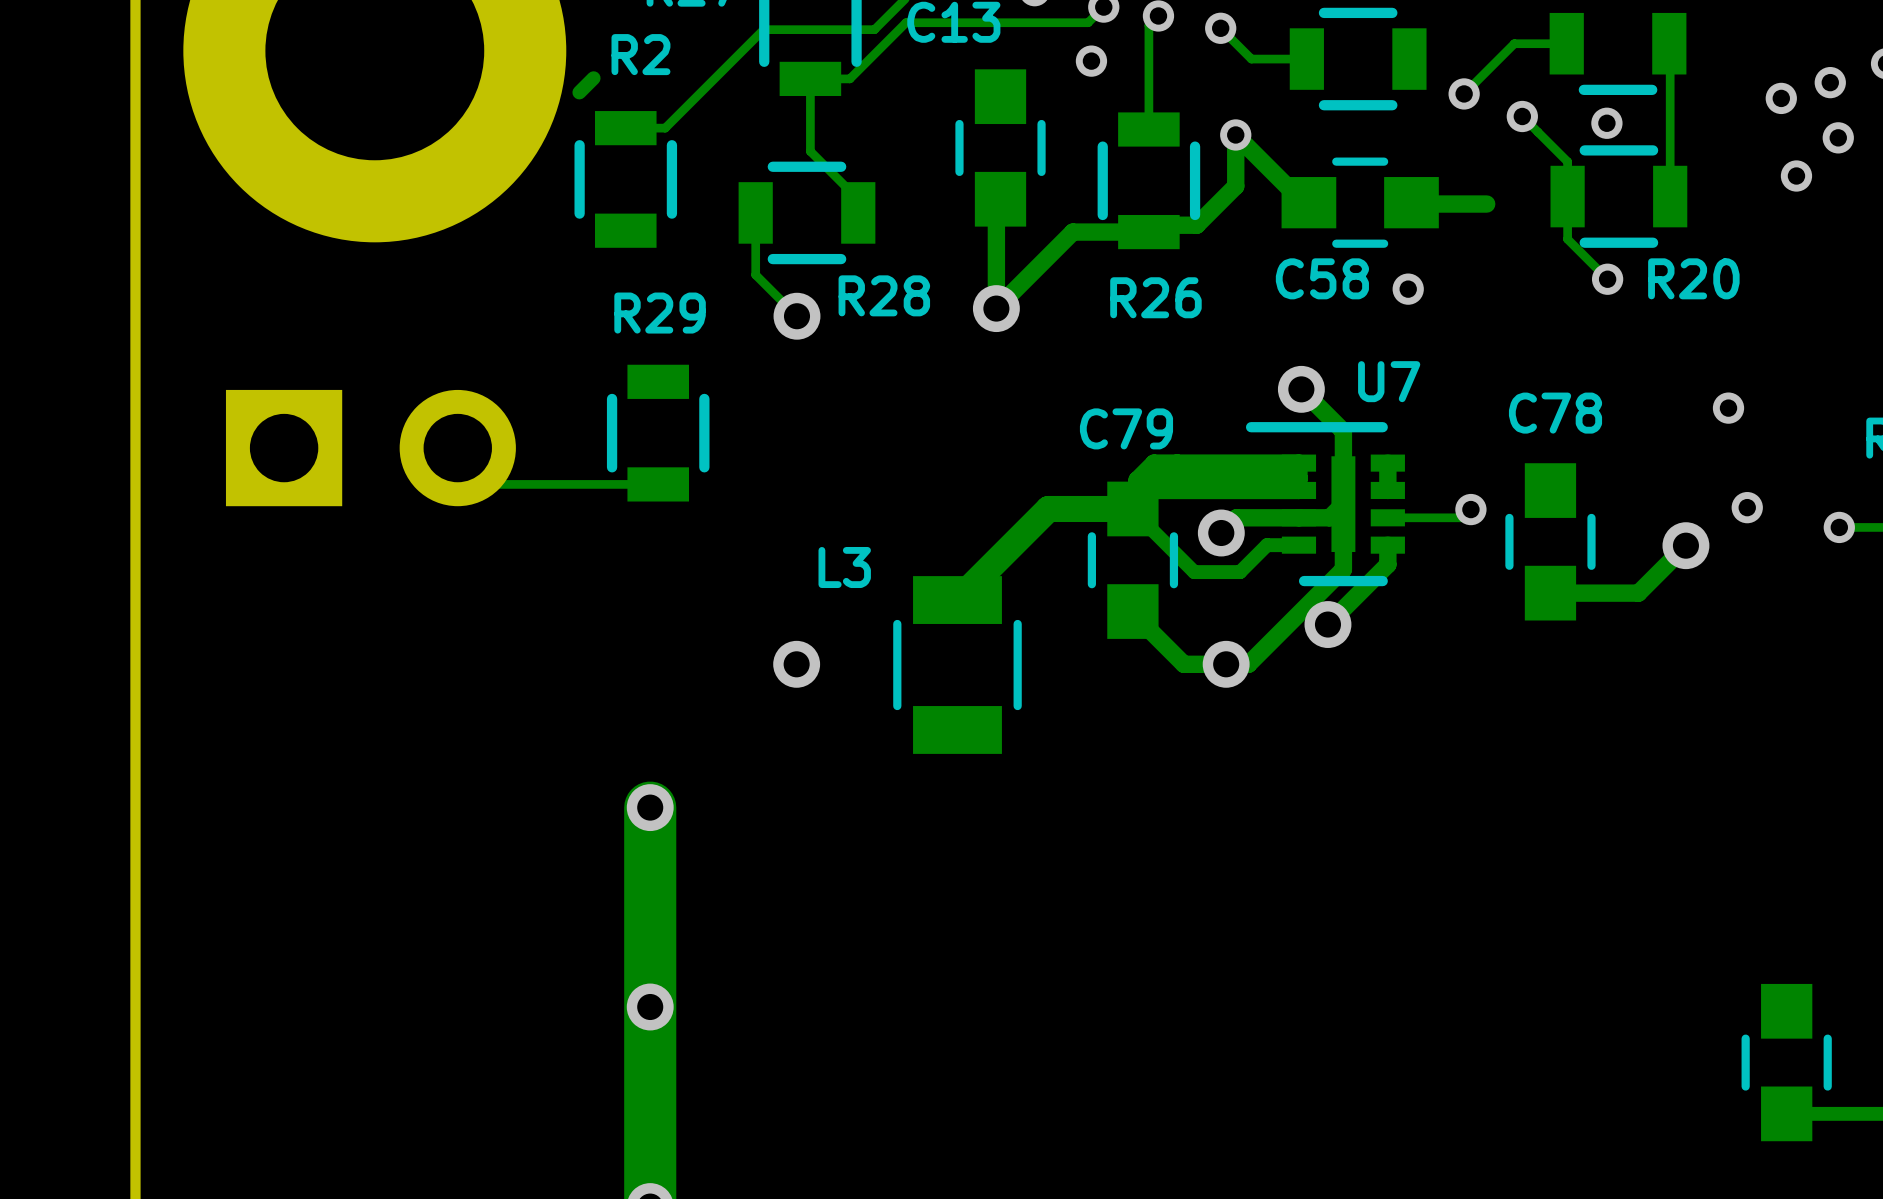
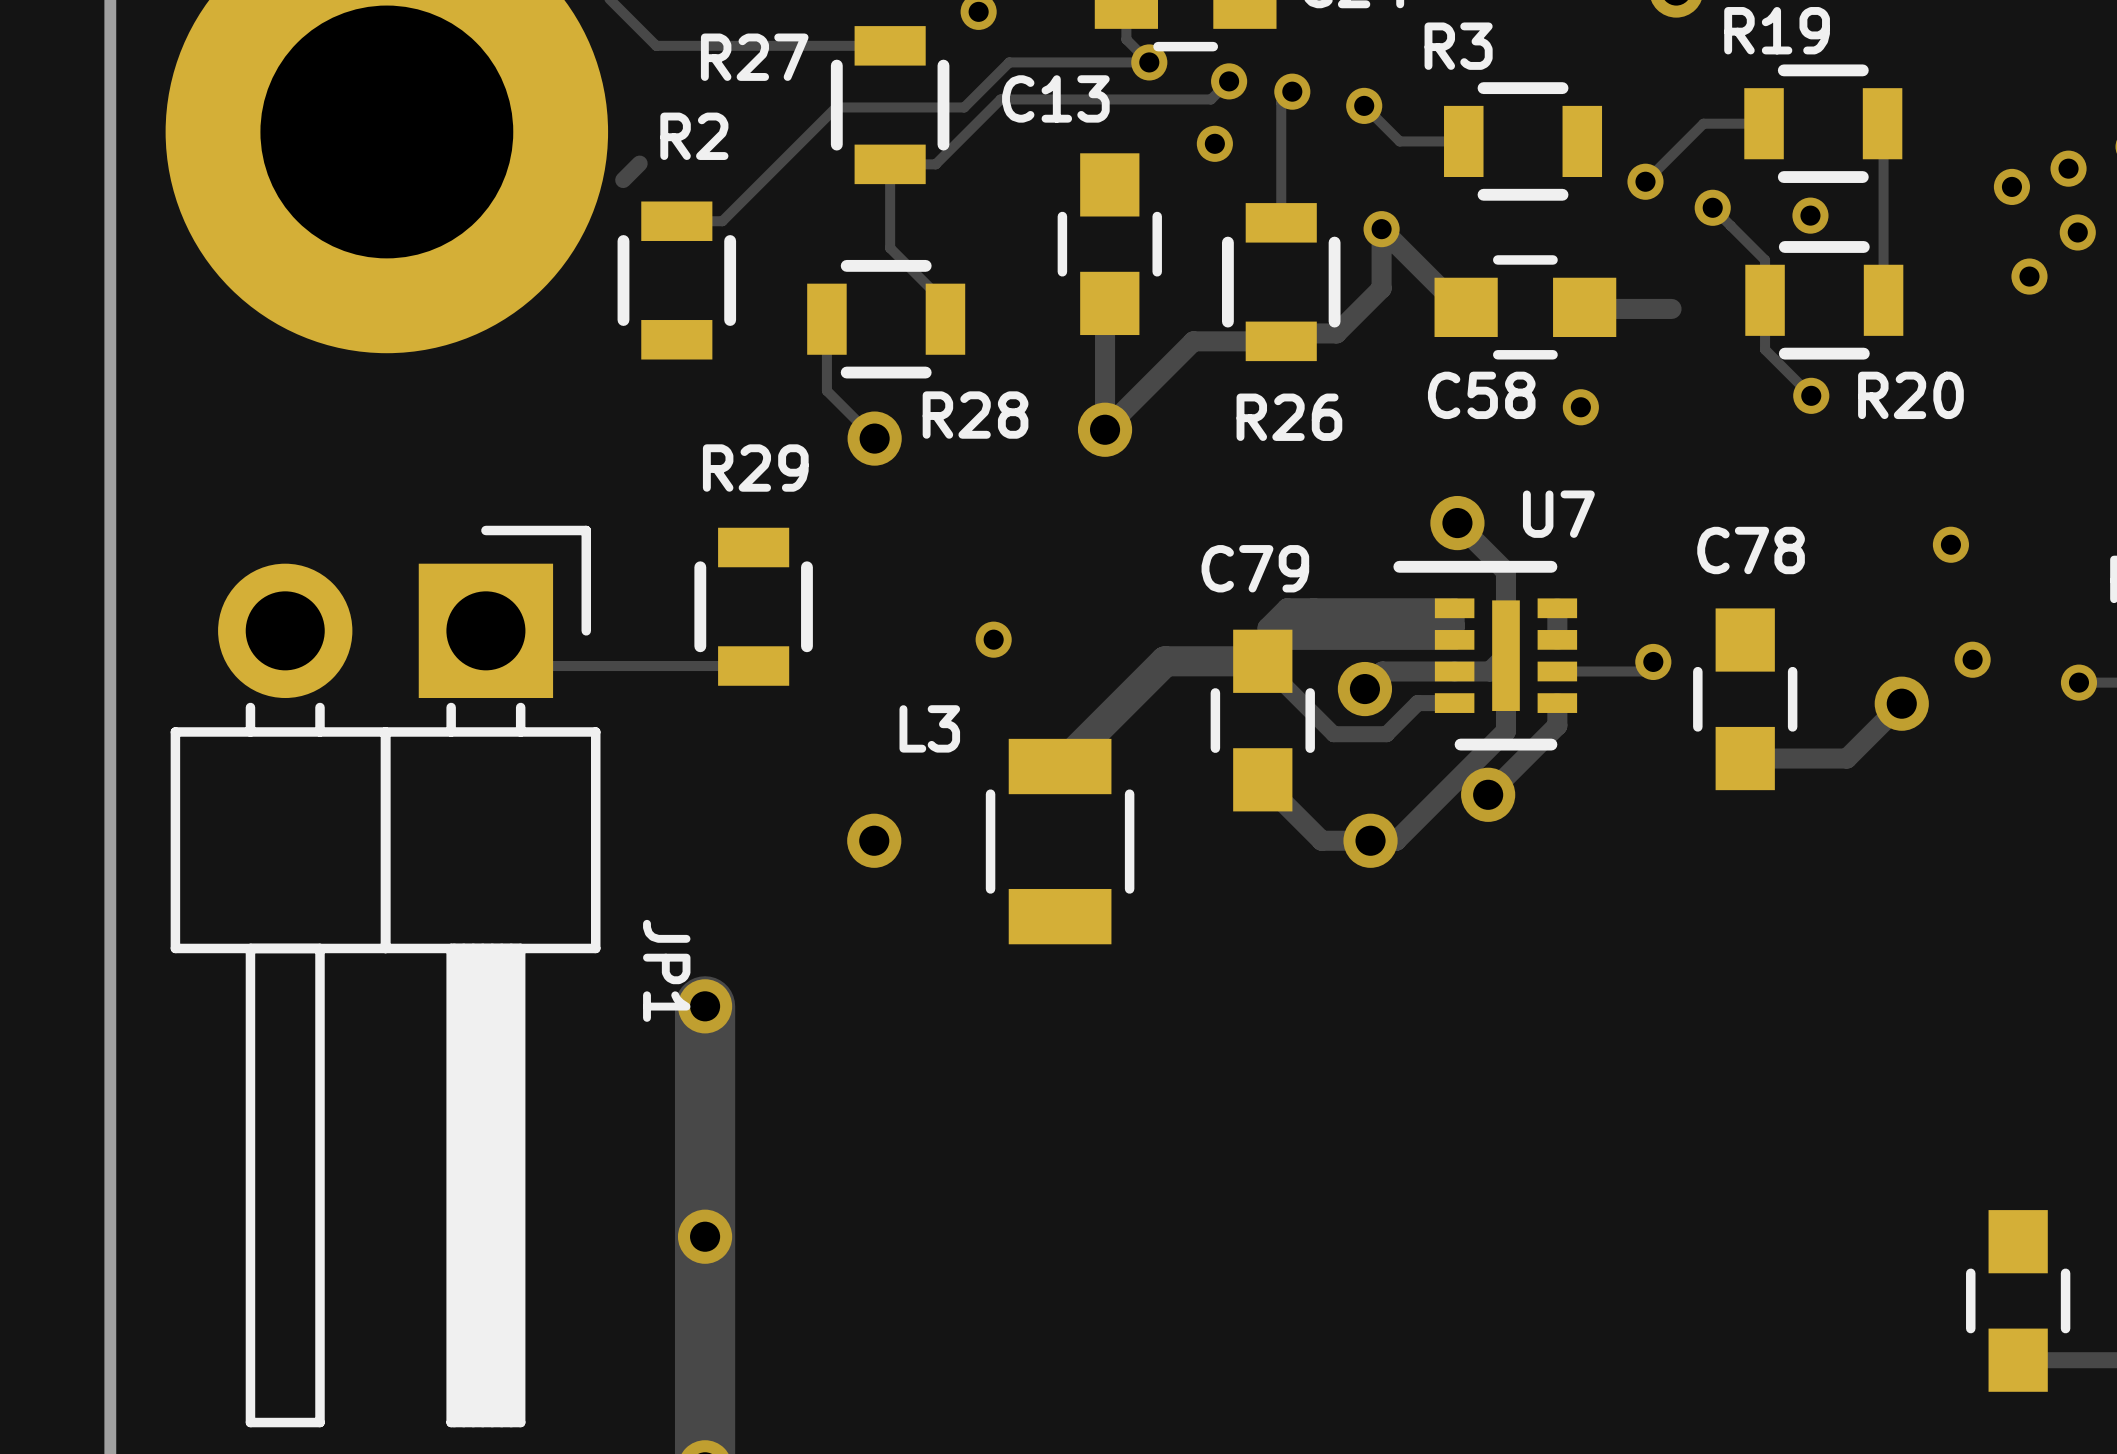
R29 position: (658, 433) -> (753, 606)
JP1 side: top (370, 448) -> bottom (385, 976)
track: (457, 448) (494, 484) (658, 484) -> none
track: none -> (485, 630) (521, 666) (753, 666)
via: none -> (993, 639)

